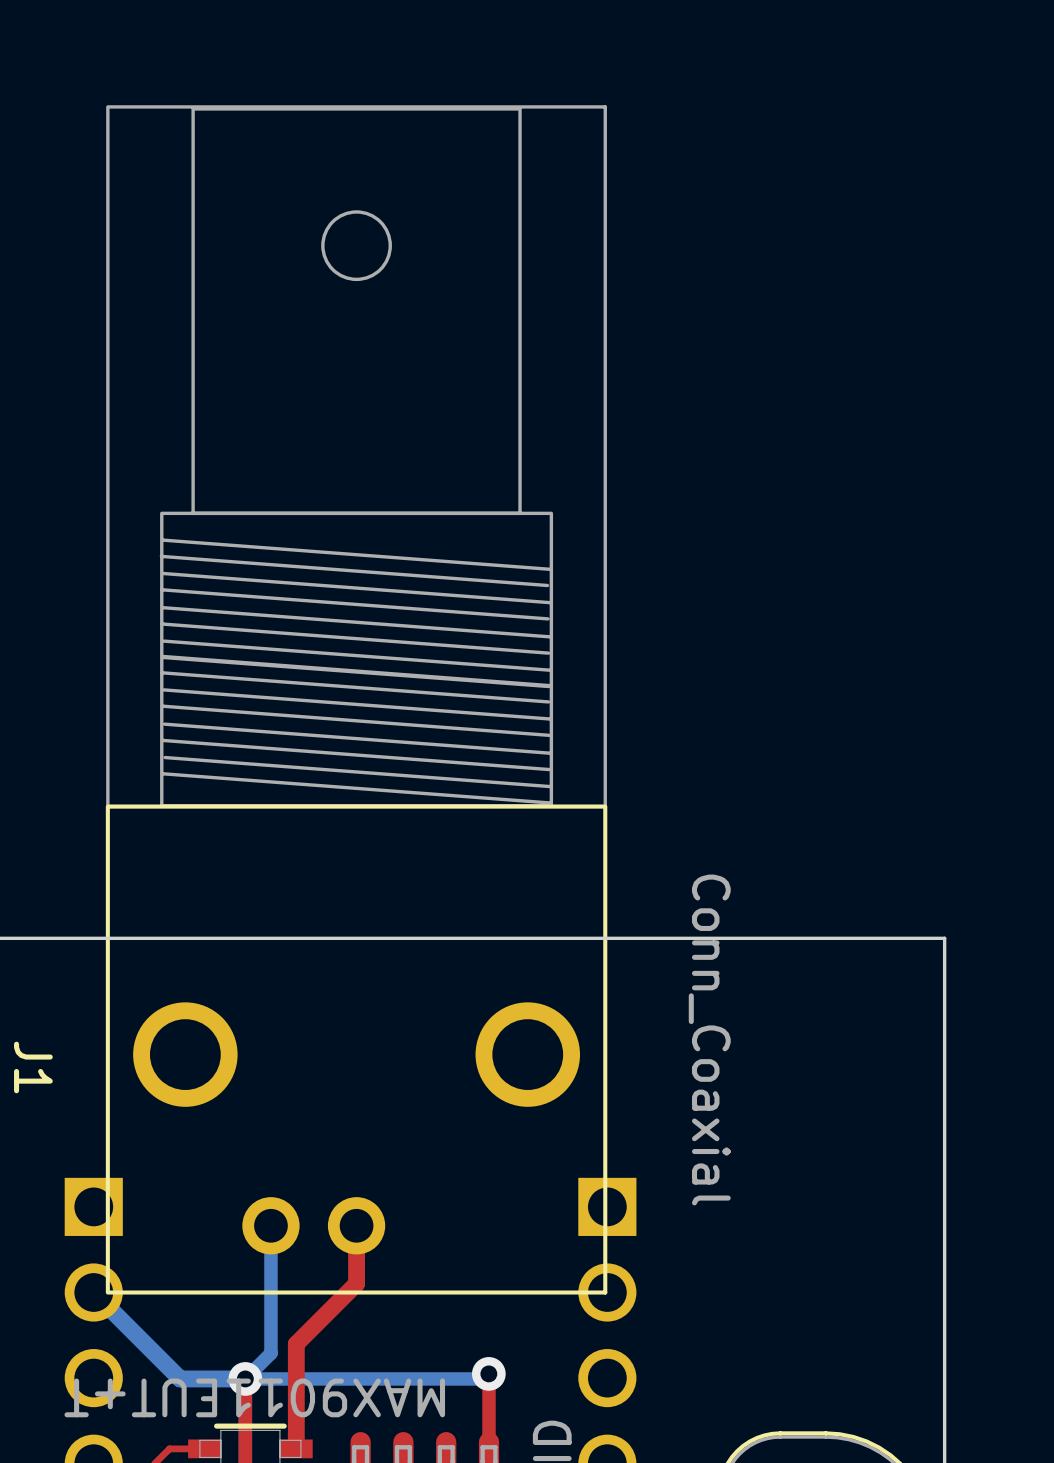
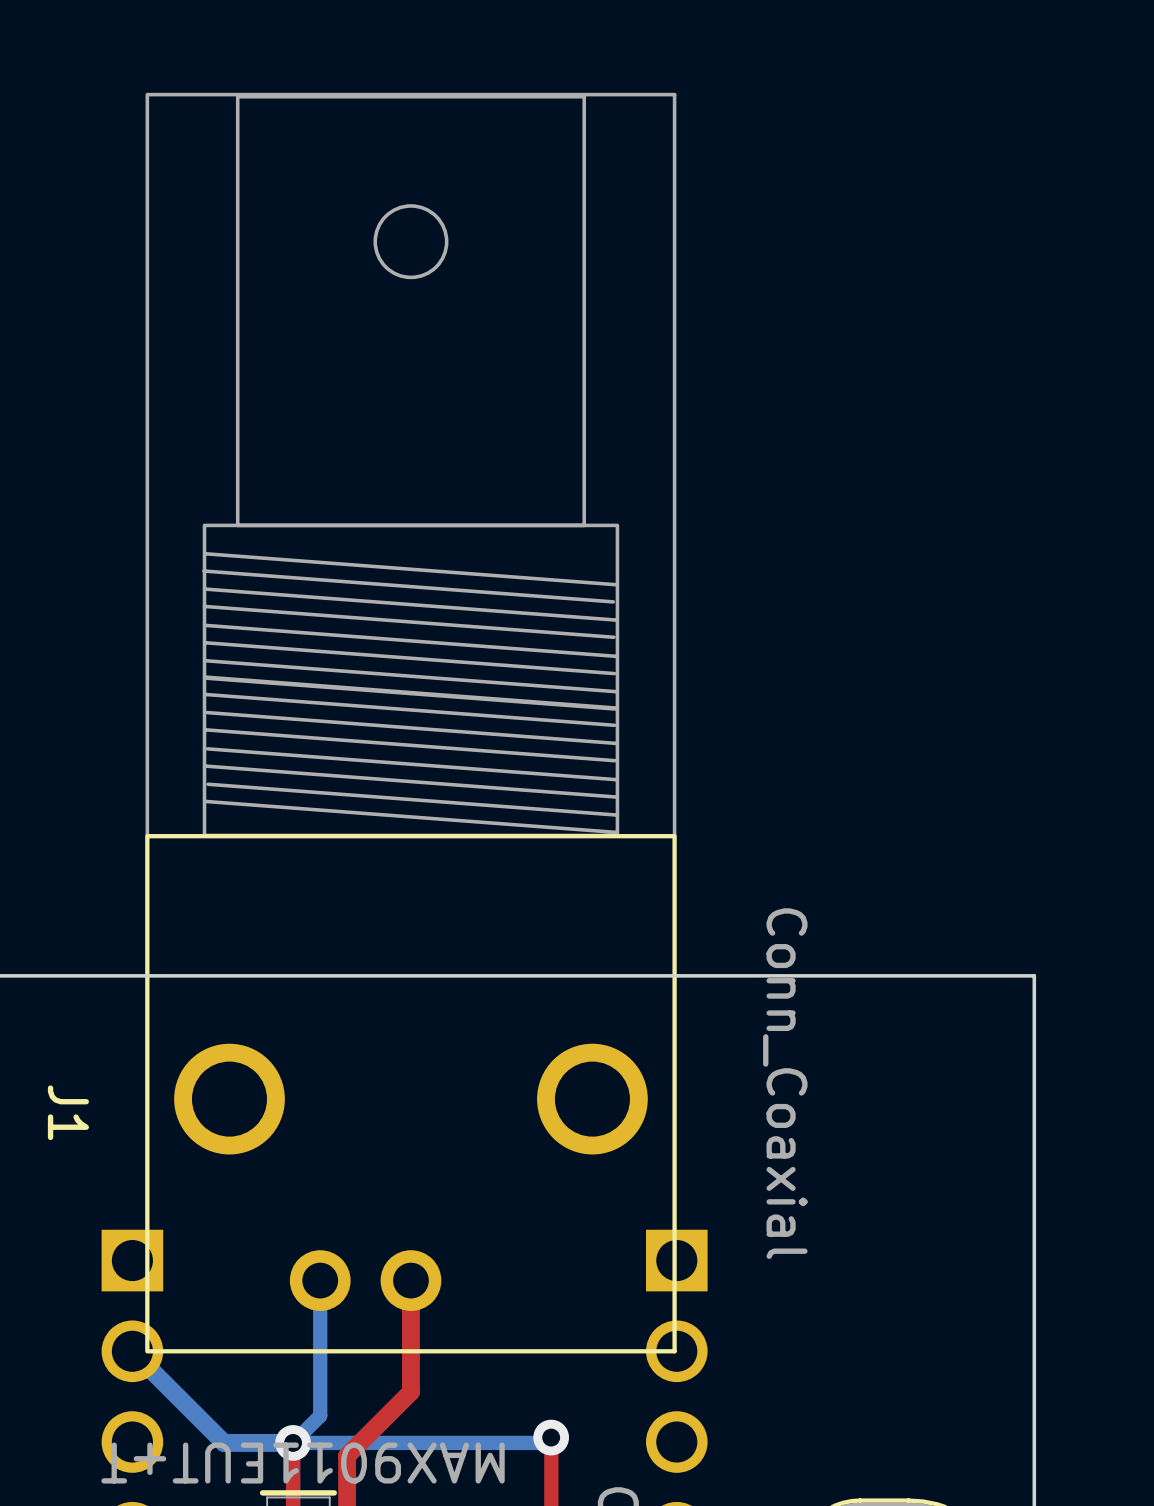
top track: (356, 1283) (296, 1343) (296, 1391) -> (410, 1342) (410, 1392) (347, 1455)

